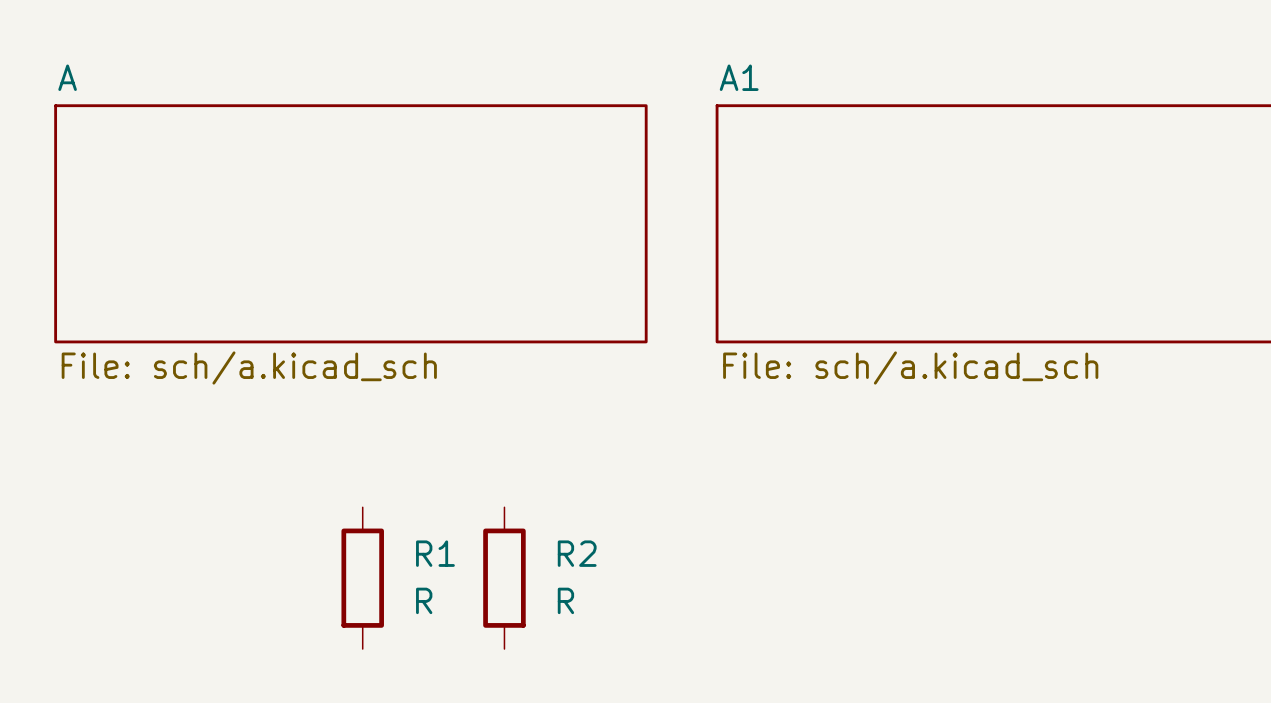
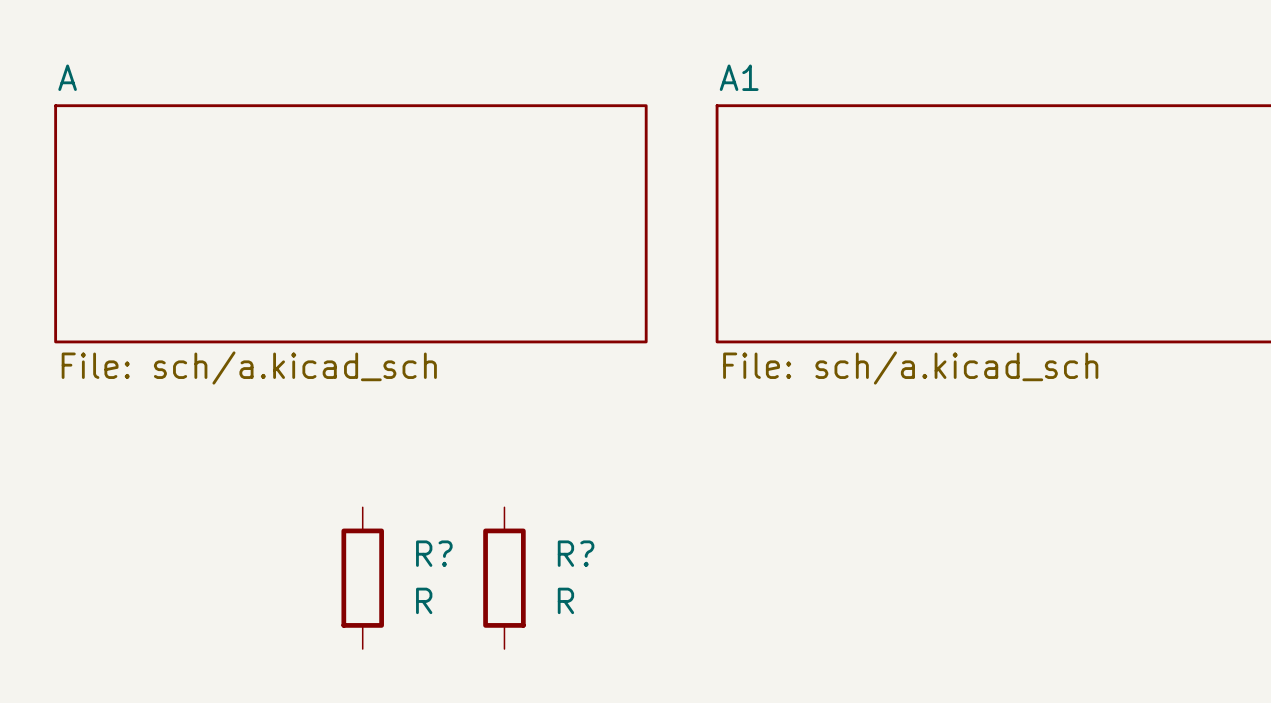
R1 name: R1 (435, 553) -> R? (434, 553)
R2 name: R2 (577, 553) -> R? (576, 553)

